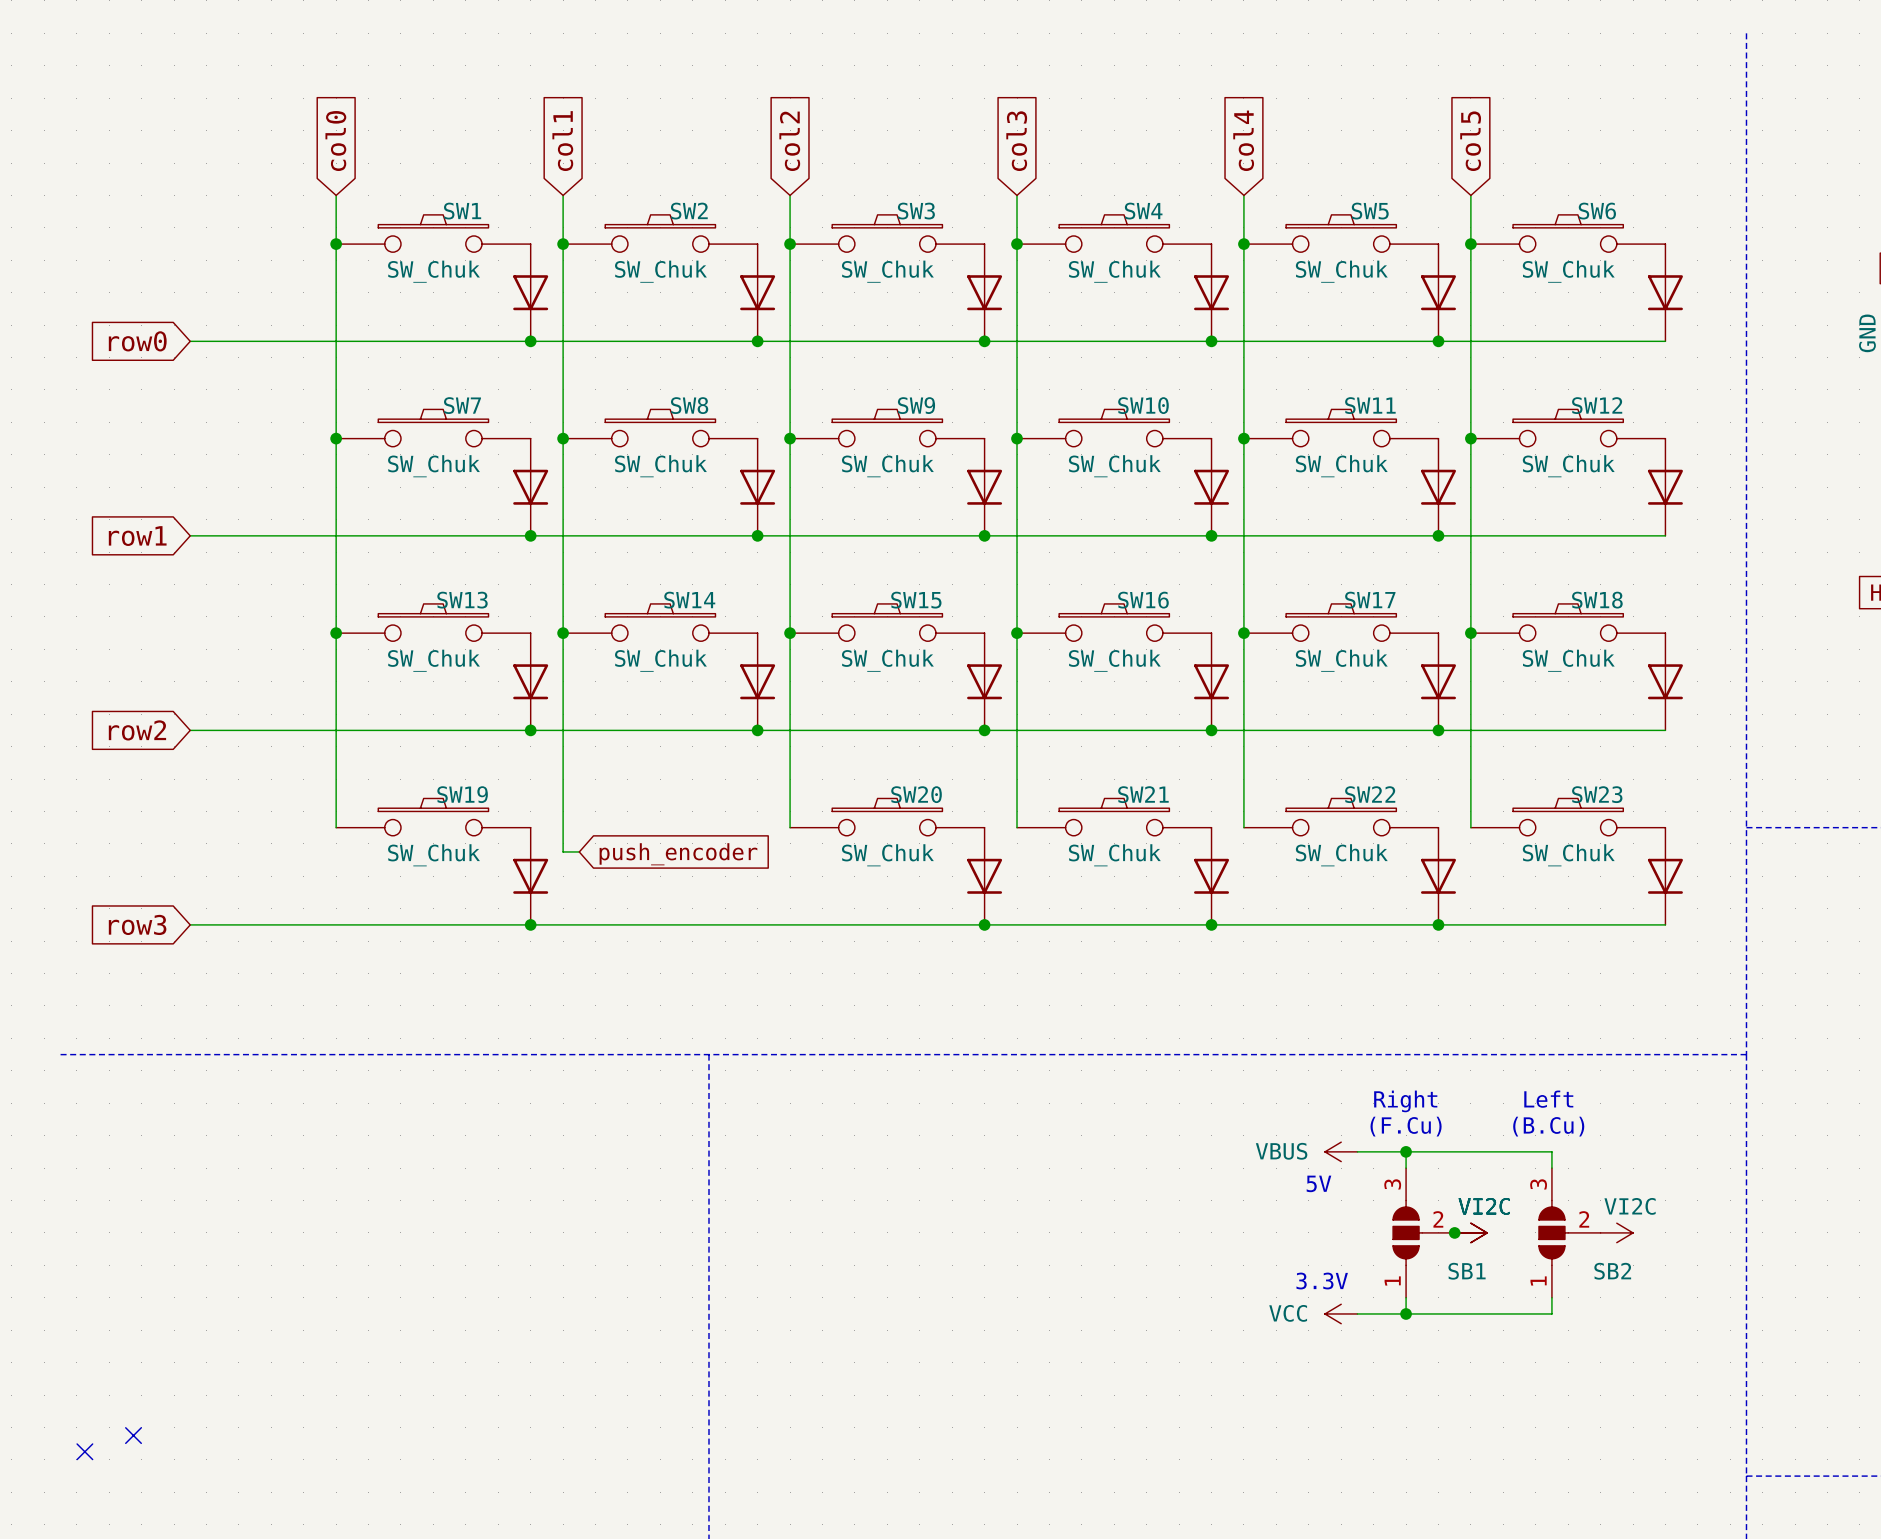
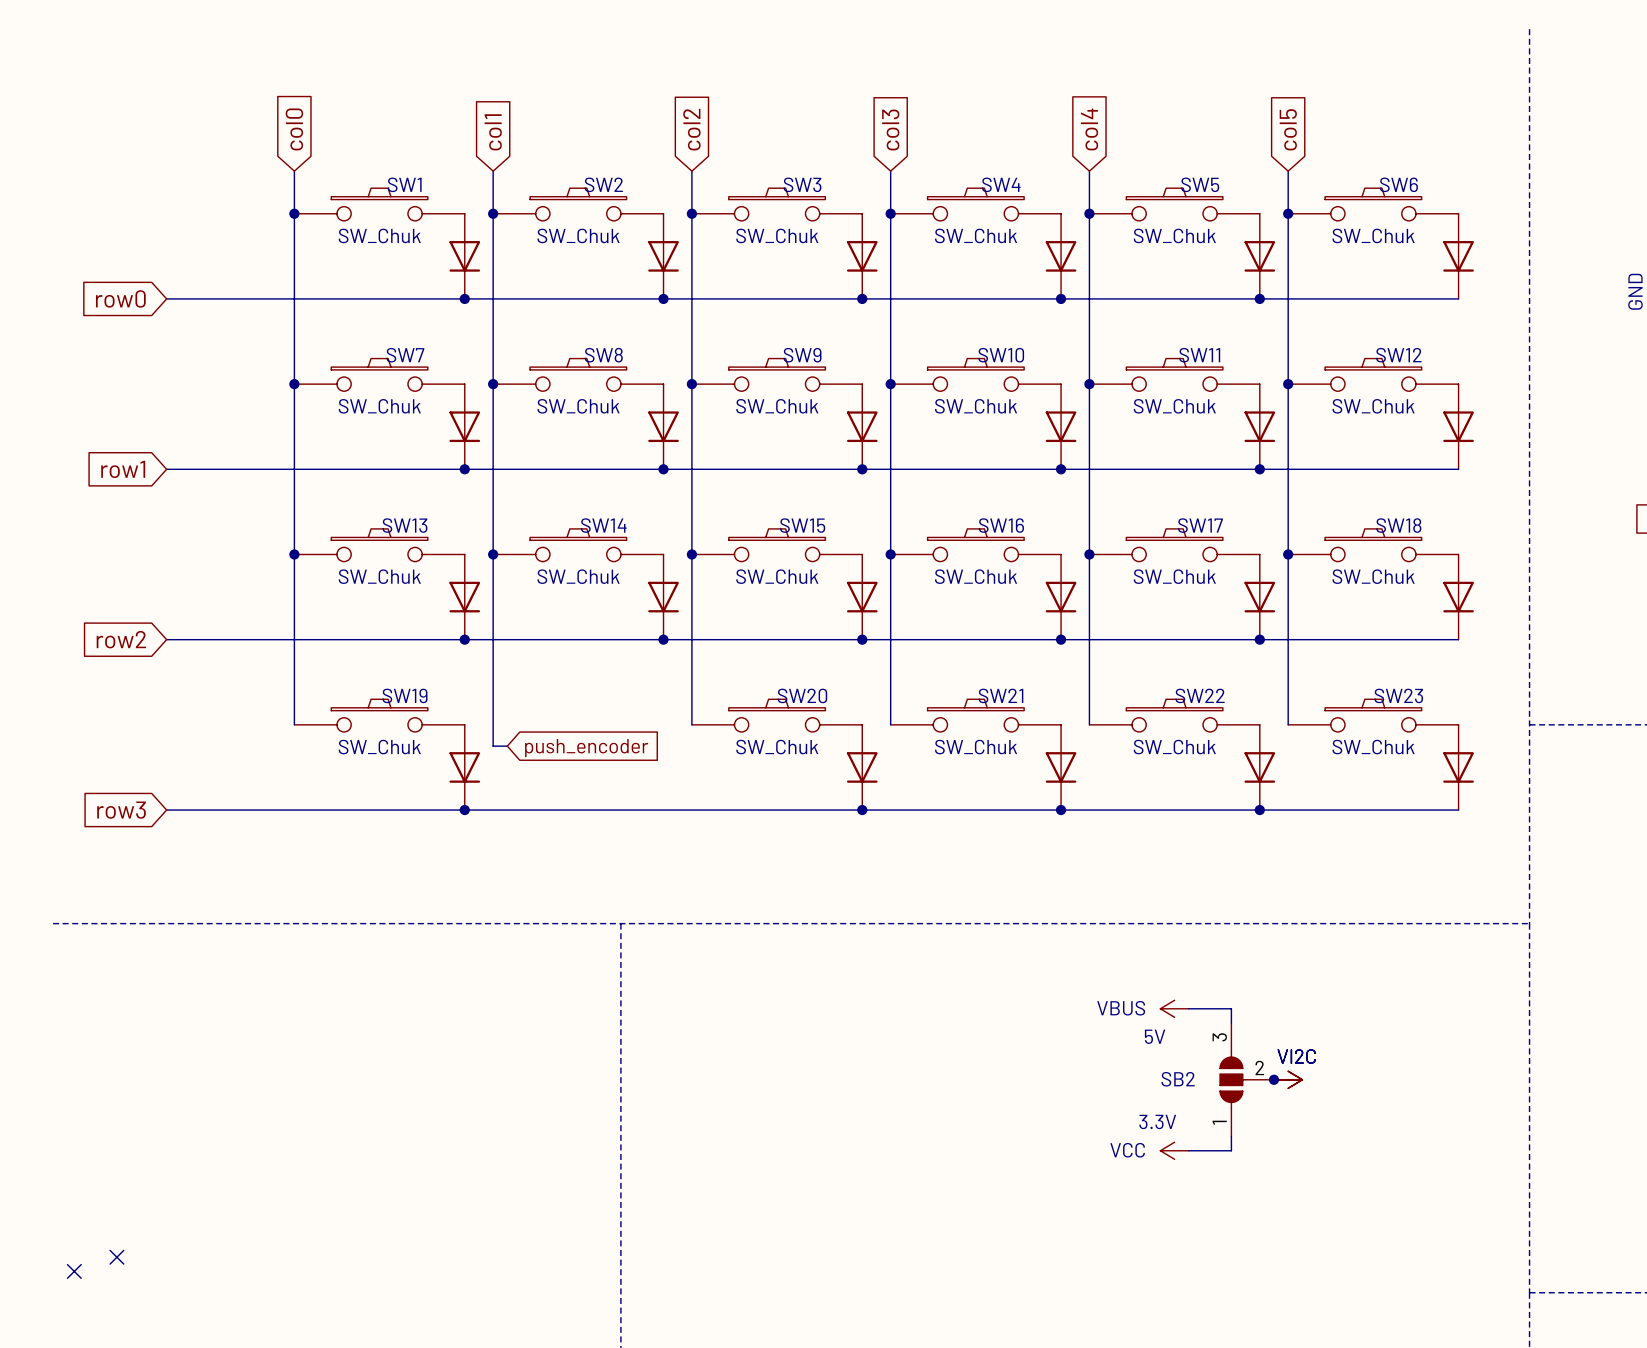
text: Left (1548, 1099) -> none
text: Right (1405, 1101) -> none
text: (F.Cu) (1406, 1126) -> none
text: (B.Cu) (1548, 1126) -> none
wire: (1406, 1151) (1551, 1151) (1551, 1168) -> none
junction: (1406, 1151) -> none
SB2: (1569, 1232) -> none
power symbol: VI2C (1616, 1232) -> none
SB1 name: SB1 (1467, 1271) -> SB2 (1178, 1079)
wire: (1551, 1297) (1551, 1313) (1406, 1313) -> none
junction: (1406, 1313) -> none

